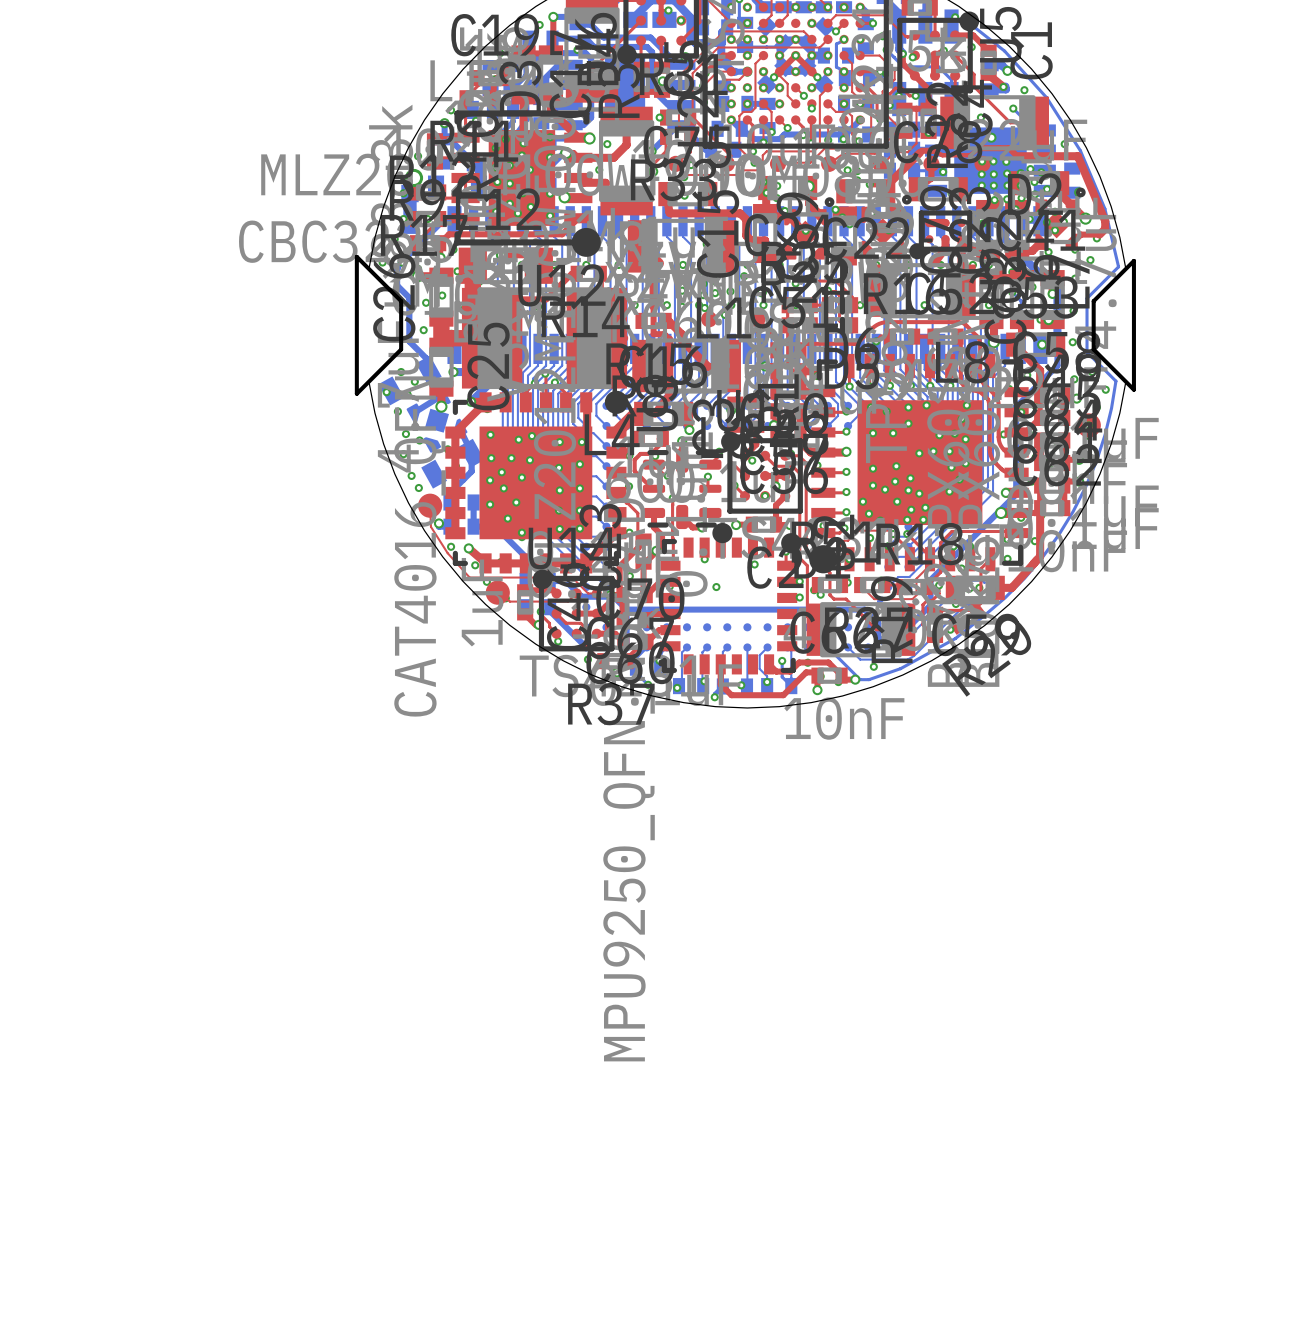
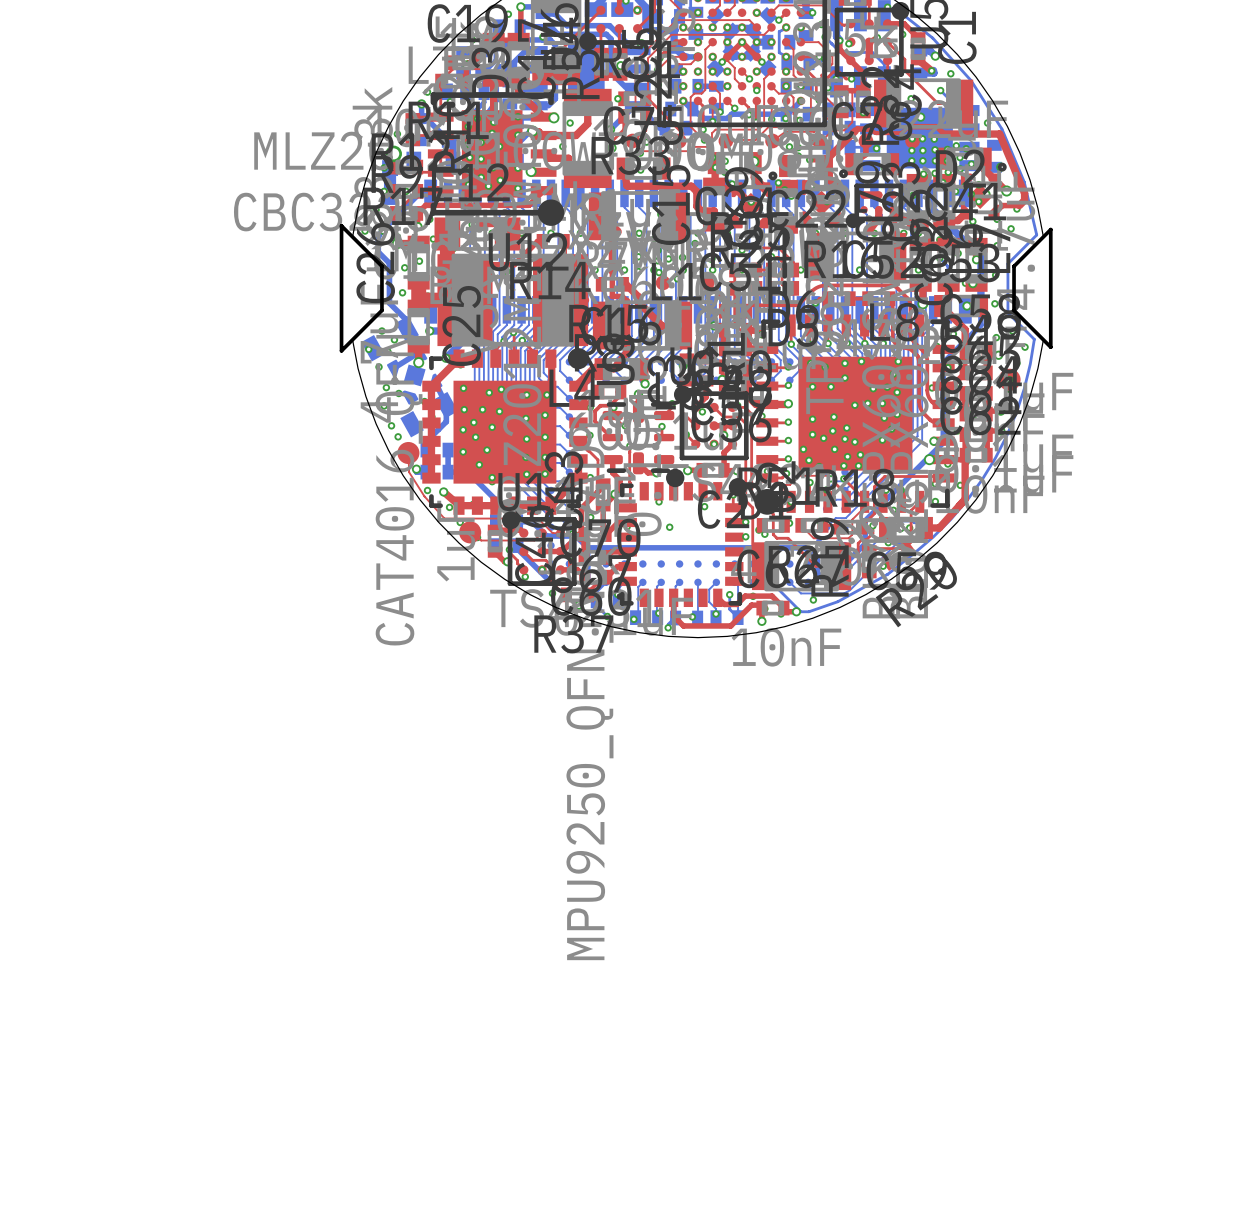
via: none -> (542, 569)

